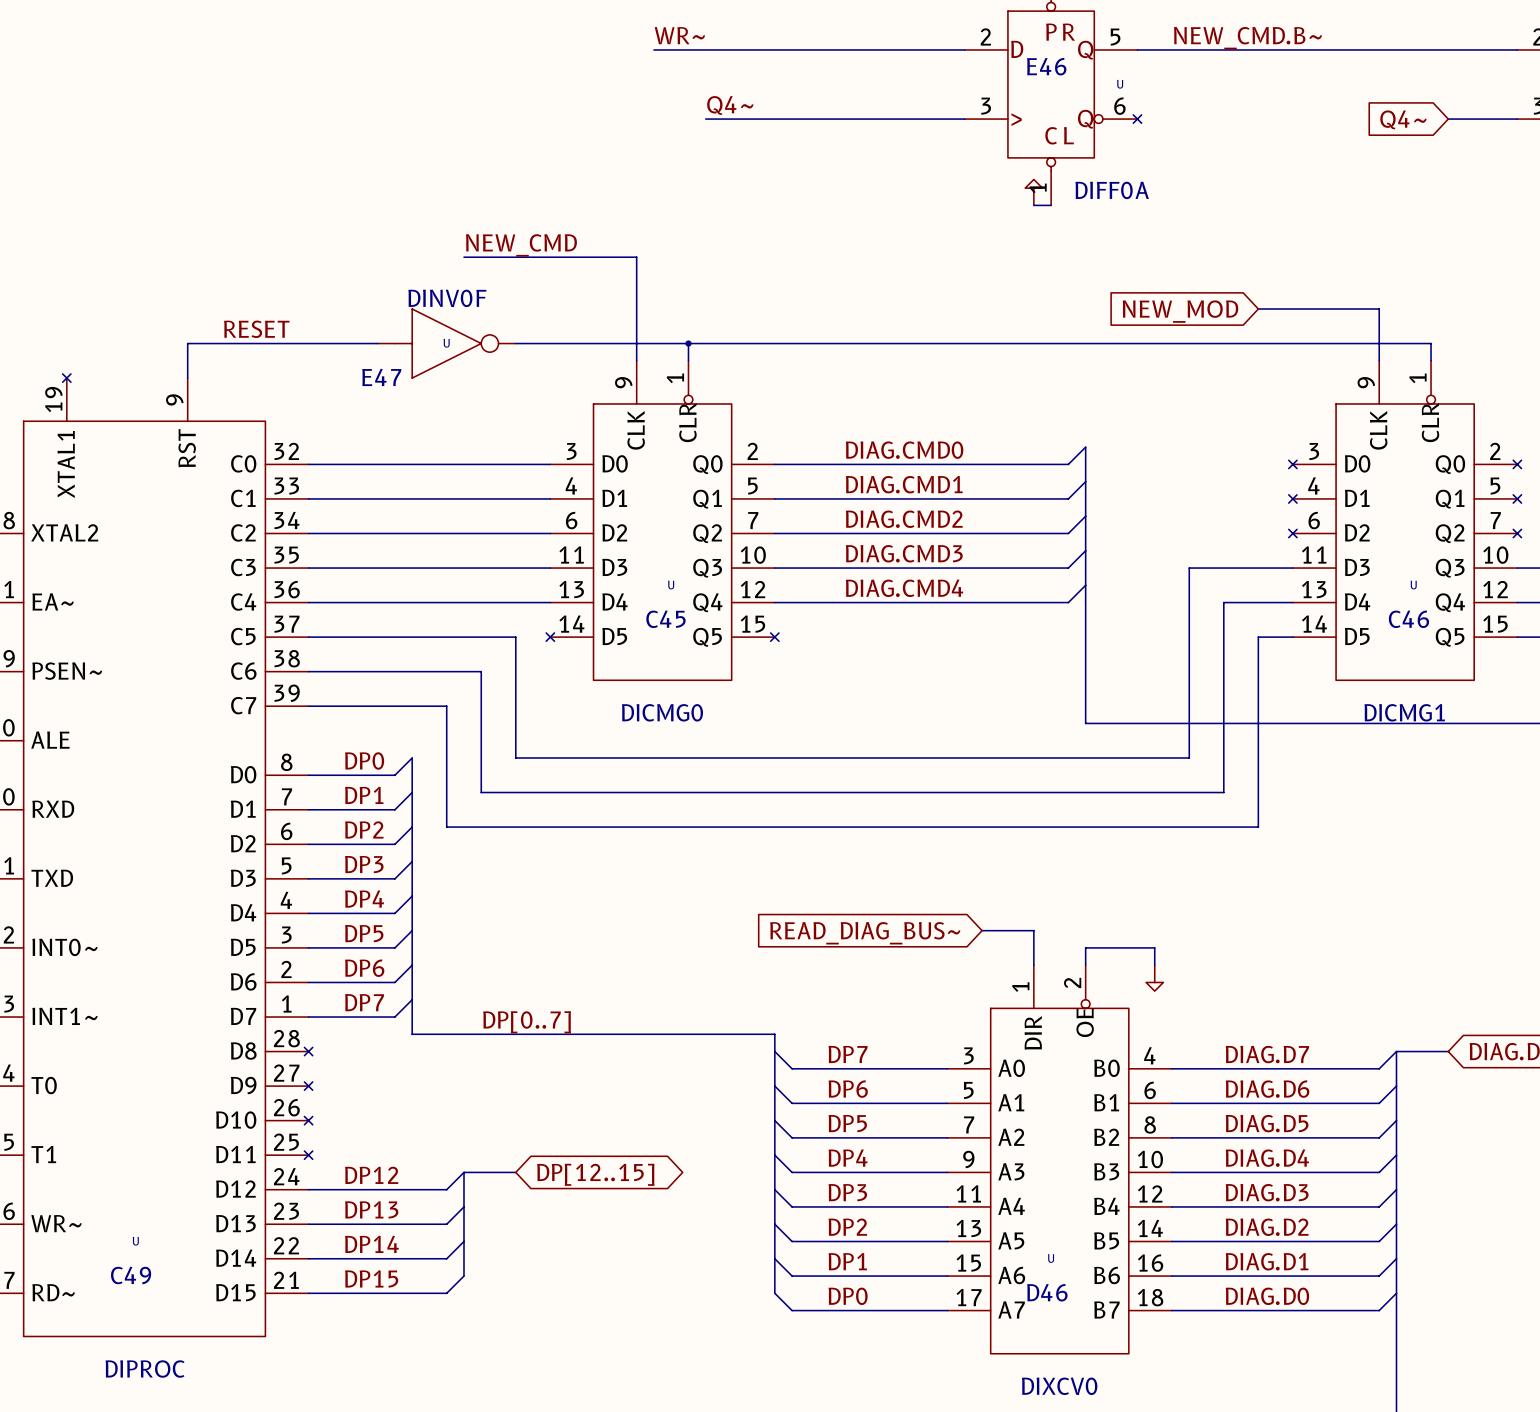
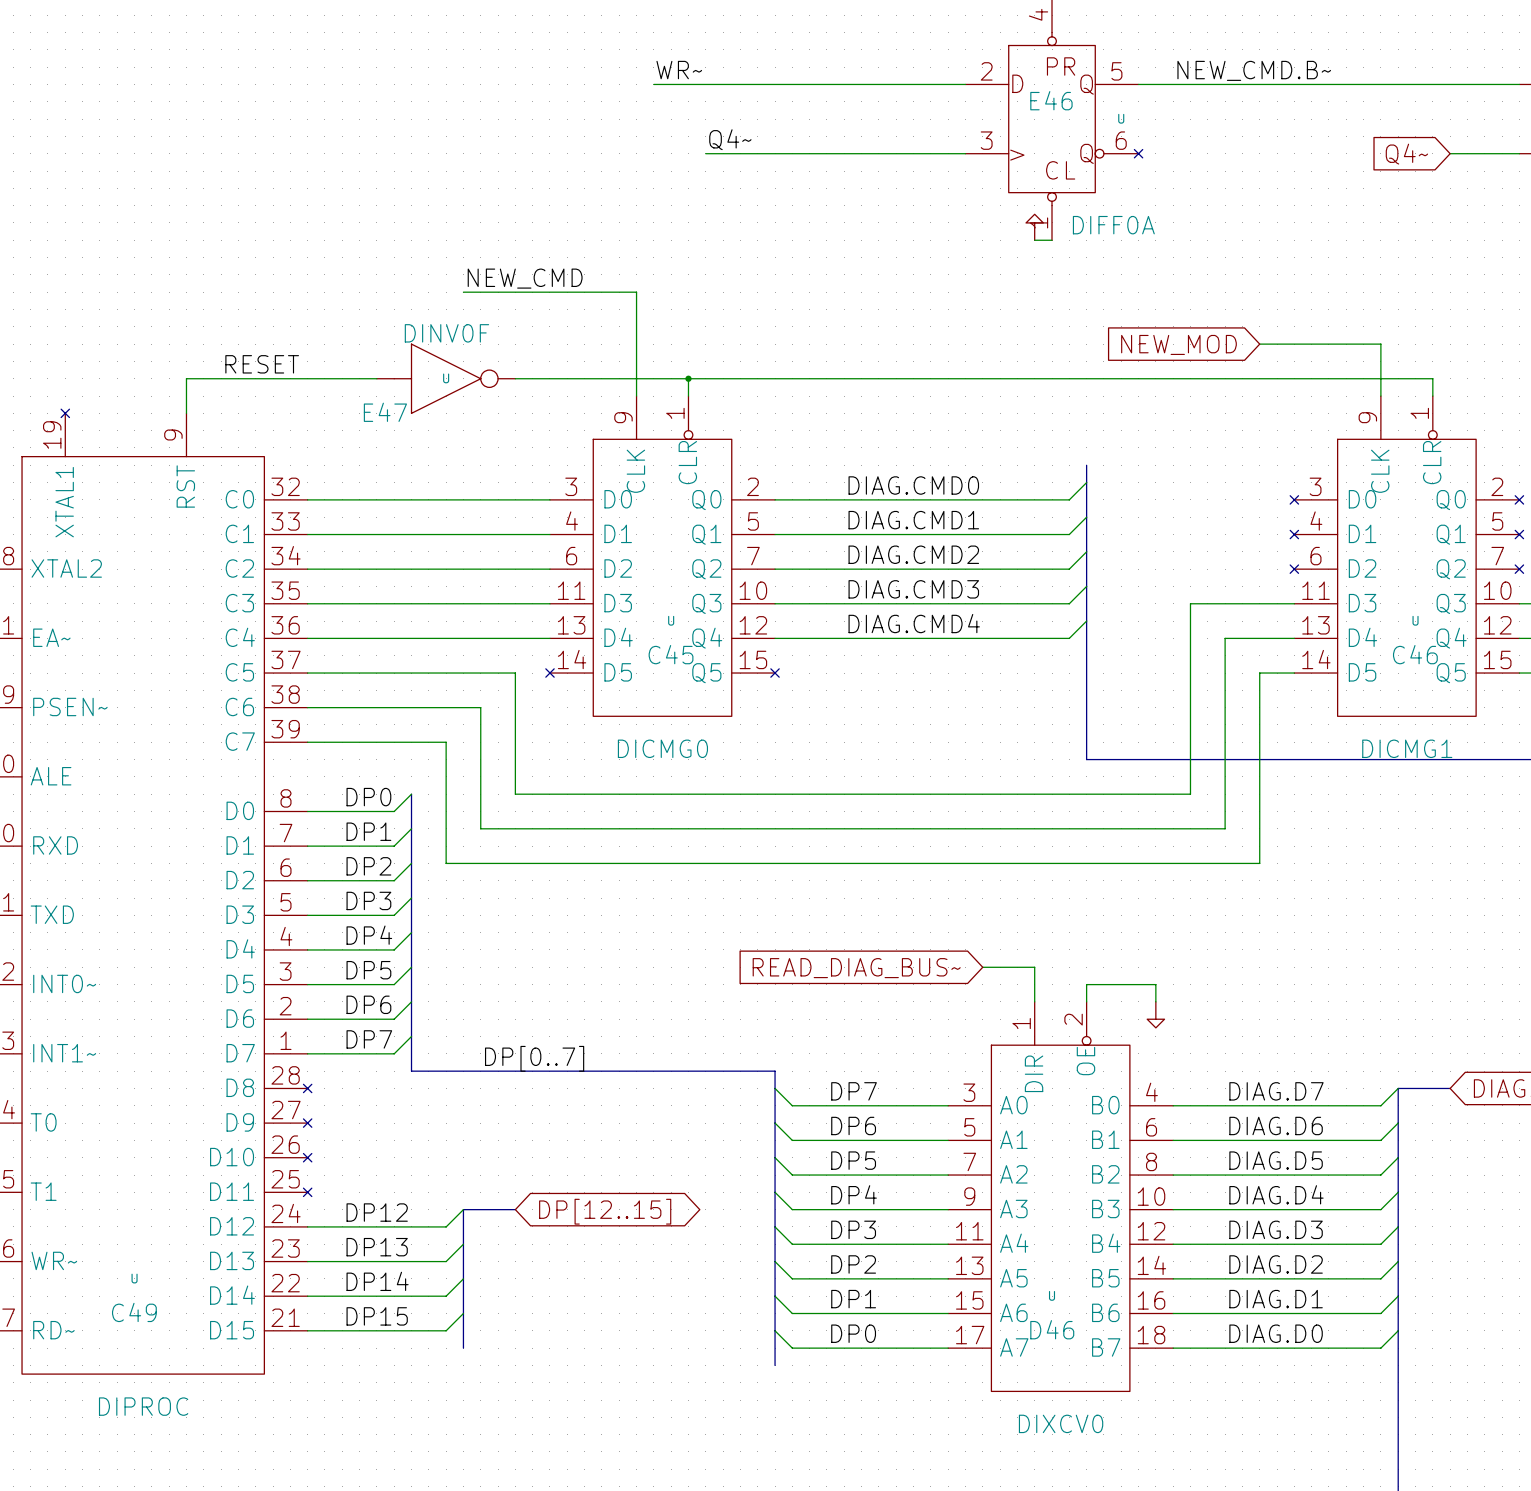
bus: none -> (1086, 465) (1086, 482)
bus: none -> (463, 1313) (463, 1348)
bus: none -> (775, 1330) (775, 1365)

